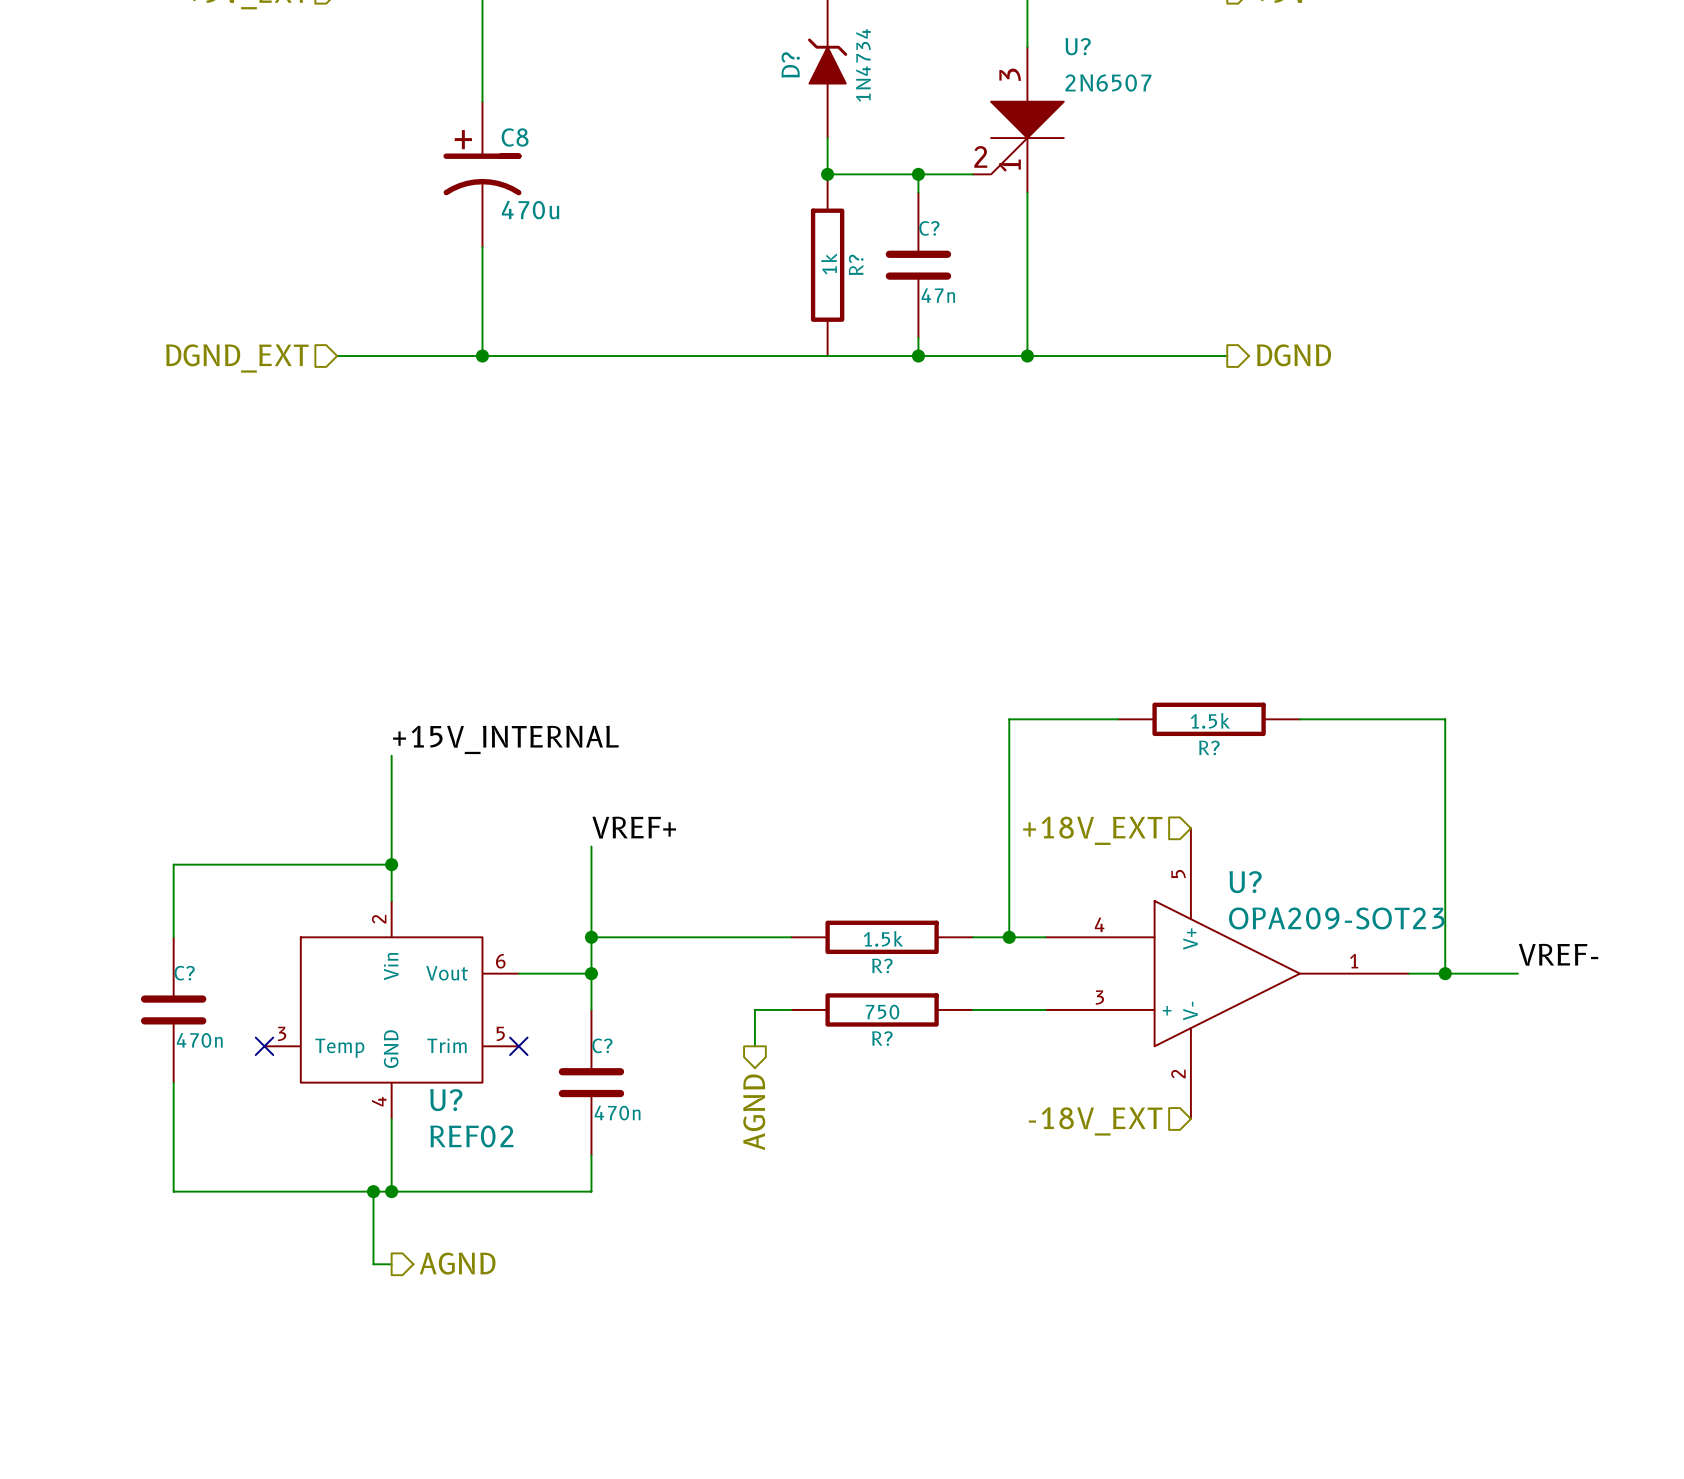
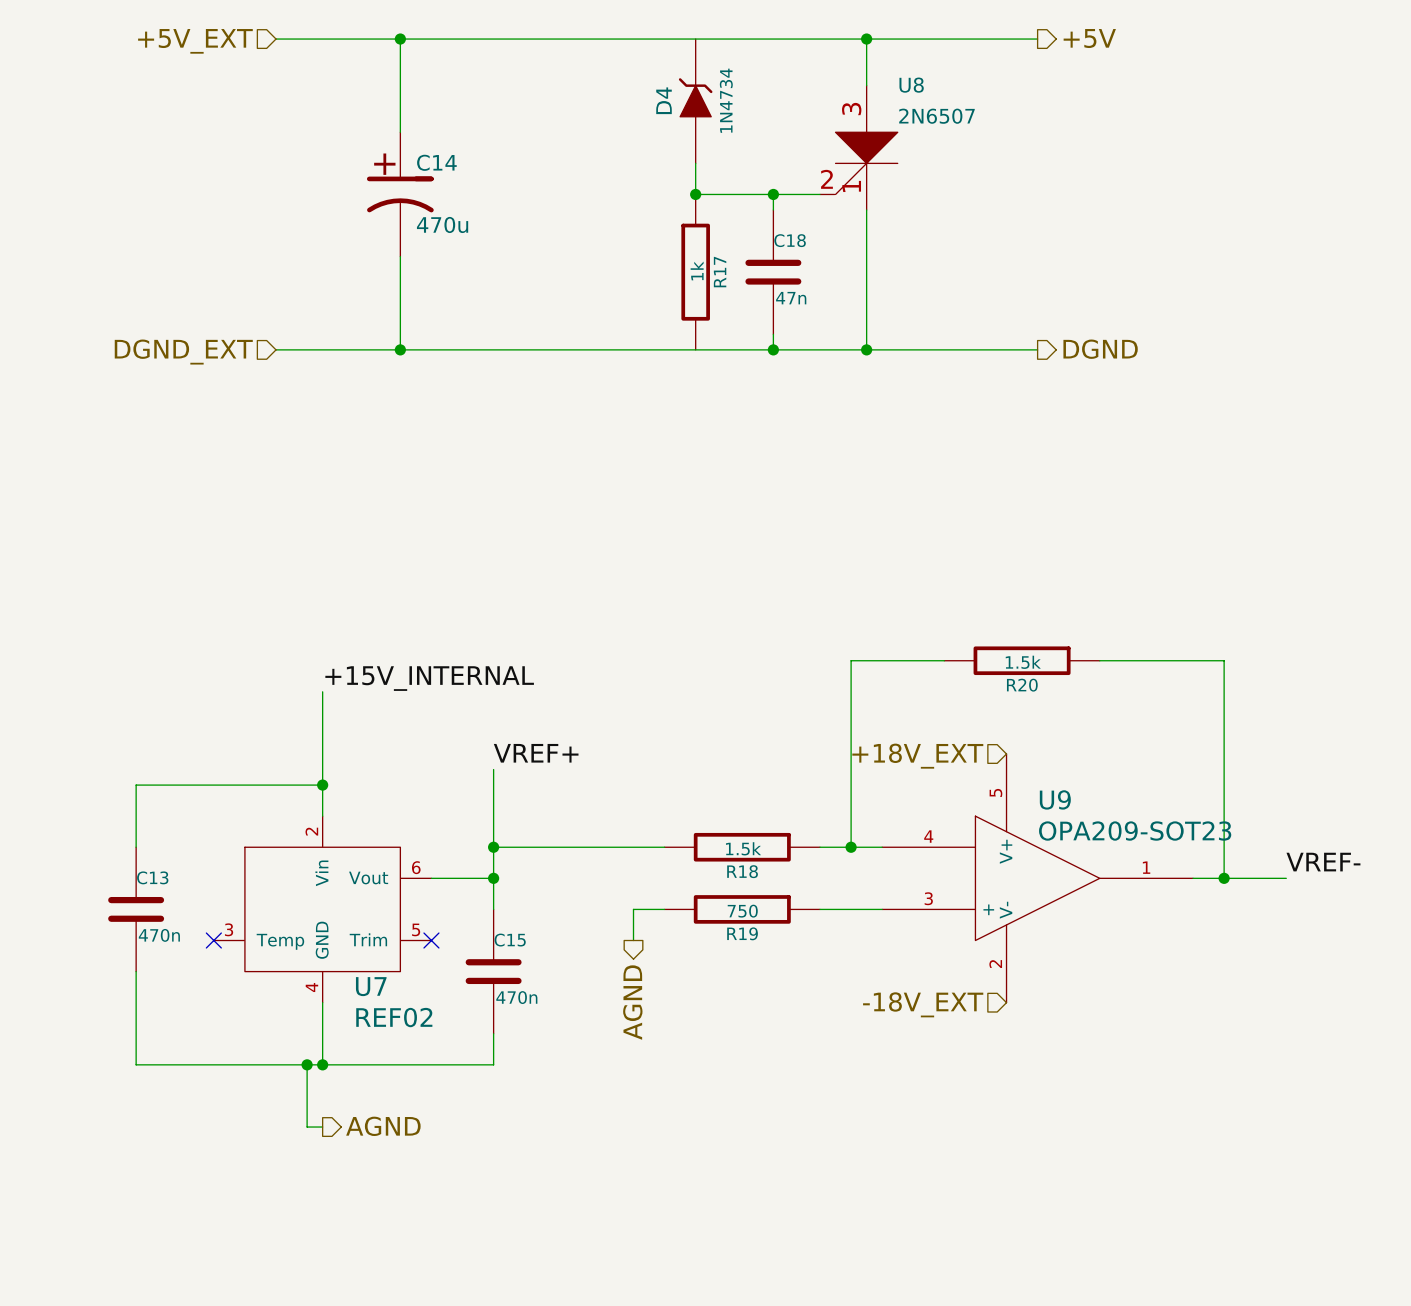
U? name: U? (1078, 46) -> U8 (911, 85)
D? name: D? (790, 64) -> D4 (664, 100)
C8 name: C8 (515, 137) -> C14 (436, 162)
C? name: C? (929, 228) -> C18 (790, 240)
R? name: R? (856, 264) -> R17 (720, 272)
R? name: R? (1209, 747) -> R20 (1022, 685)
U? name: U? (1245, 882) -> U9 (1055, 799)
R? name: R? (882, 965) -> R18 (742, 871)
C? name: C? (184, 973) -> C13 (152, 877)
R? name: R? (882, 1038) -> R19 (742, 933)
C? name: C? (602, 1045) -> C15 (510, 940)
U? name: U? (446, 1100) -> U7 (371, 986)

